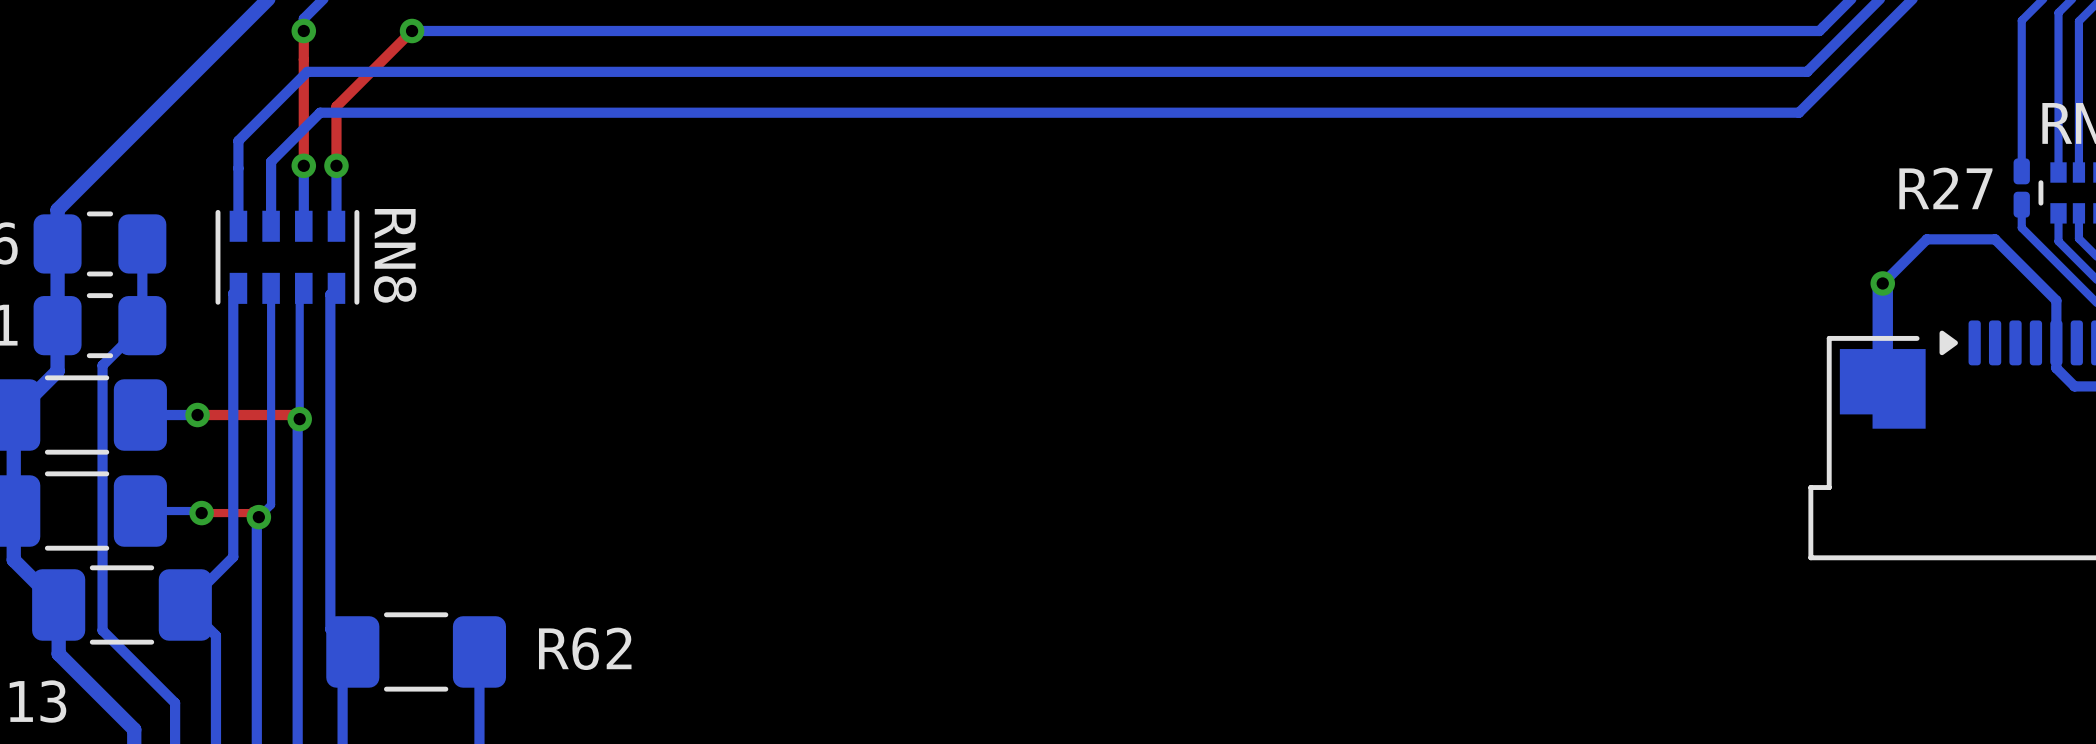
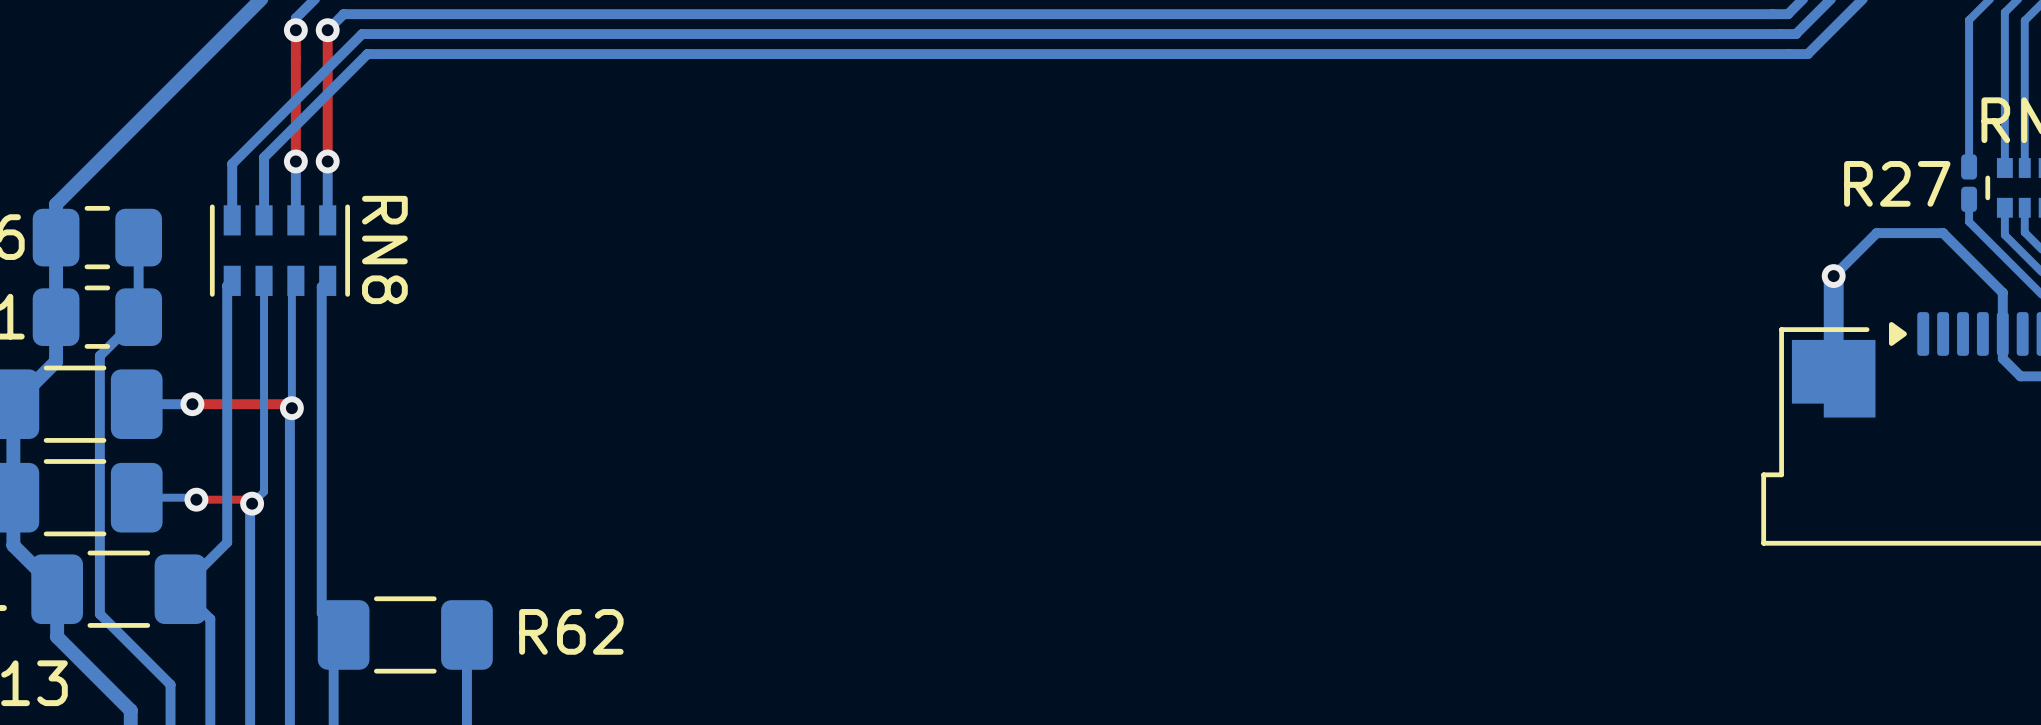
bottom track: (1835, 14) (1819, 31) (412, 31) -> (1788, 14) (343, 14) (327, 30)
top track: (412, 31) (336, 106) -> (327, 30) (327, 103)
via position: (412, 31) -> (327, 30)
bottom track: (1844, 34) (1807, 71) (307, 71) (238, 140) (238, 168) -> (1796, 34) (362, 34) (232, 163)
bottom track: (1856, 55) (1799, 112) (320, 112) -> (1807, 54) (367, 54) (311, 109)

